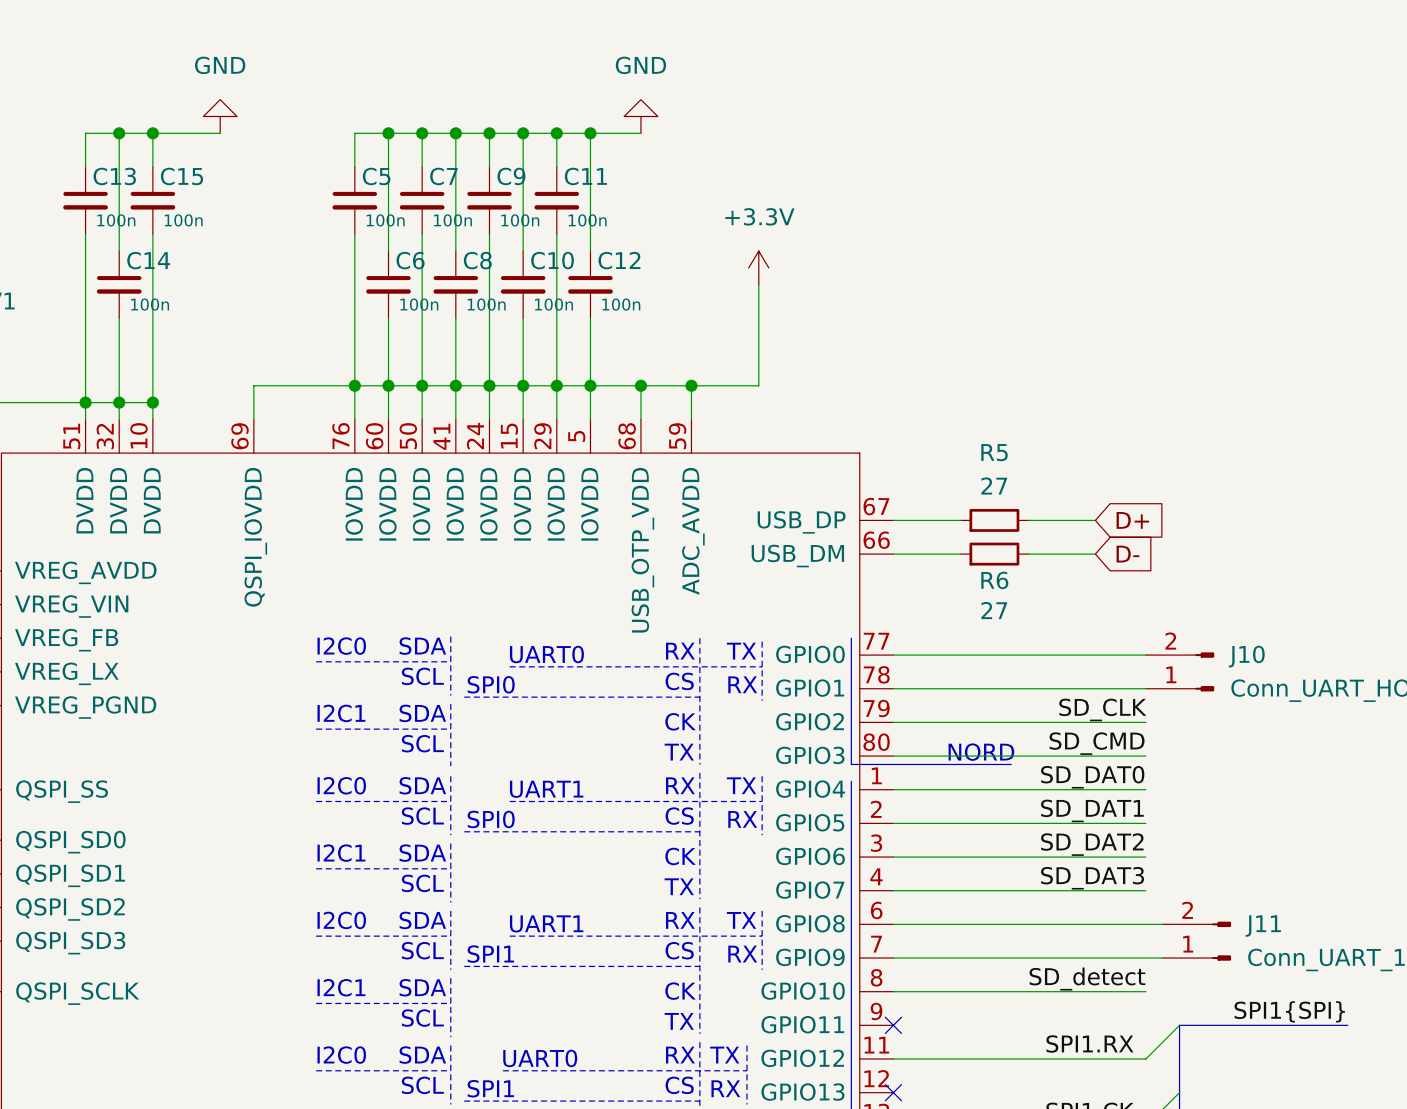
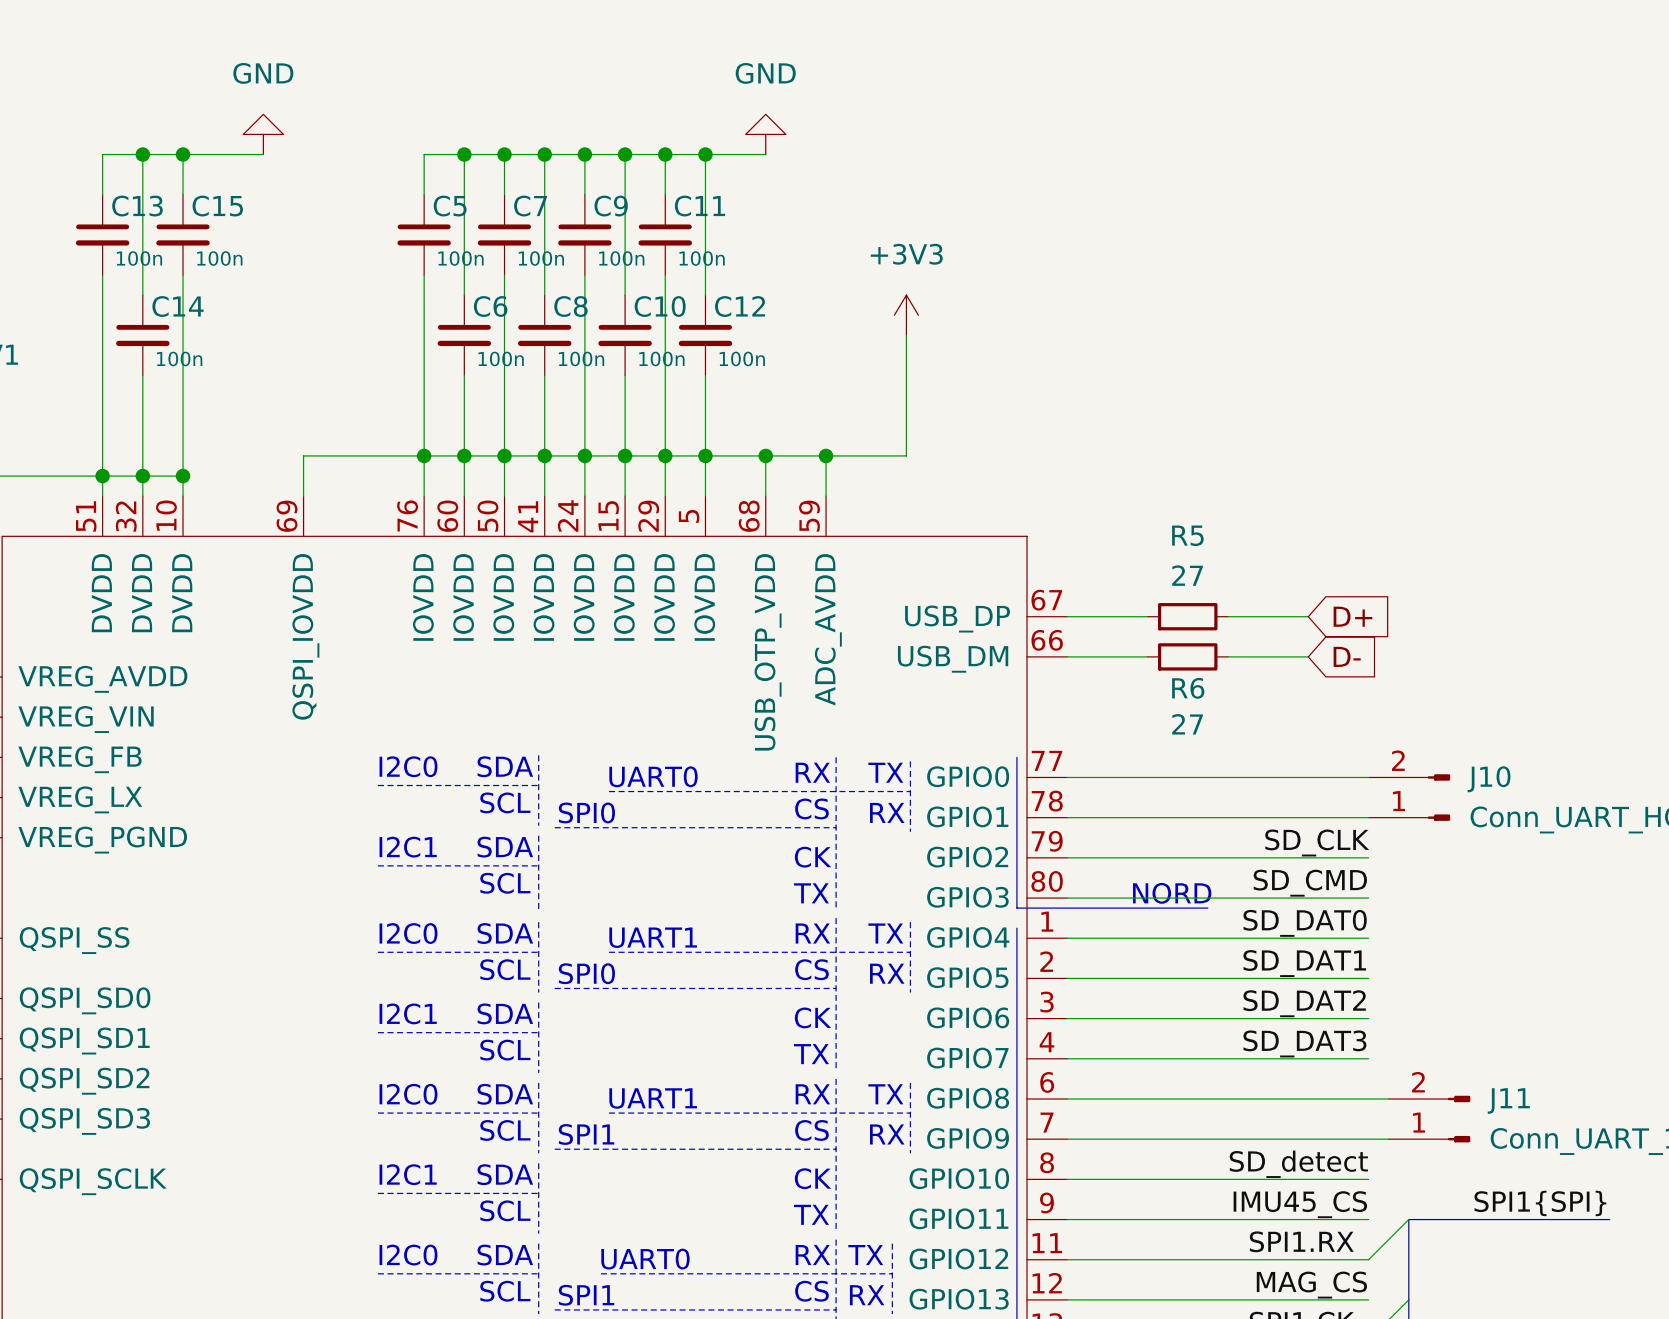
power symbol: +3.3V (758, 267) -> +3V3 (906, 315)
label: none -> IMU45_CS (1300, 1204)
wire: none -> (1067, 1219) (1368, 1219)
no-connect mark: (893, 1025) -> none
label: none -> MAG_CS (1311, 1285)
wire: none -> (1067, 1299) (1368, 1299)
no-connect mark: (893, 1092) -> none

